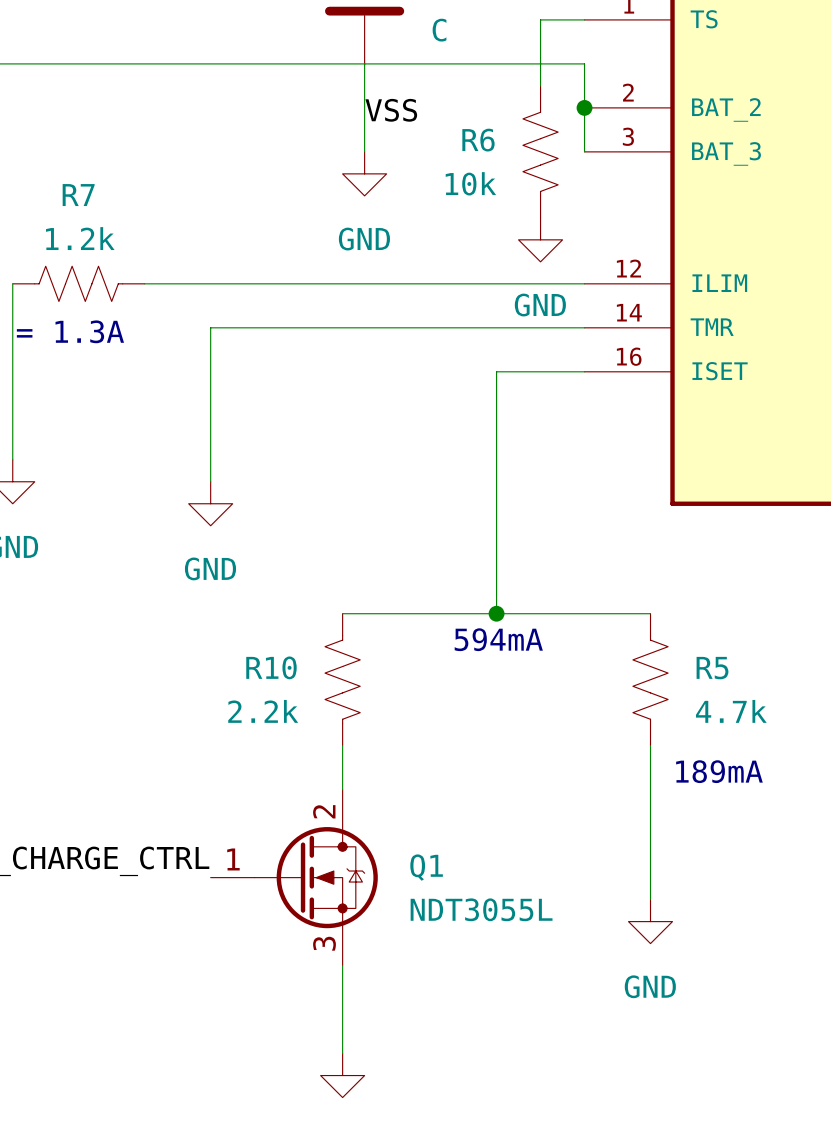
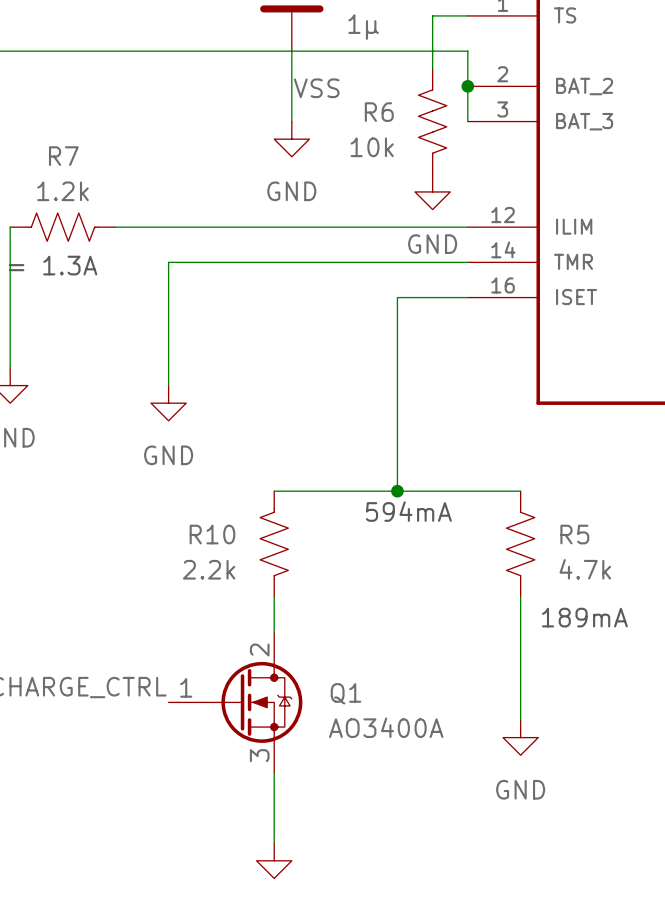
part value: C (439, 30) -> 1µ (363, 27)
Q1 value: NDT3055L (481, 909) -> AO3400A (386, 727)

